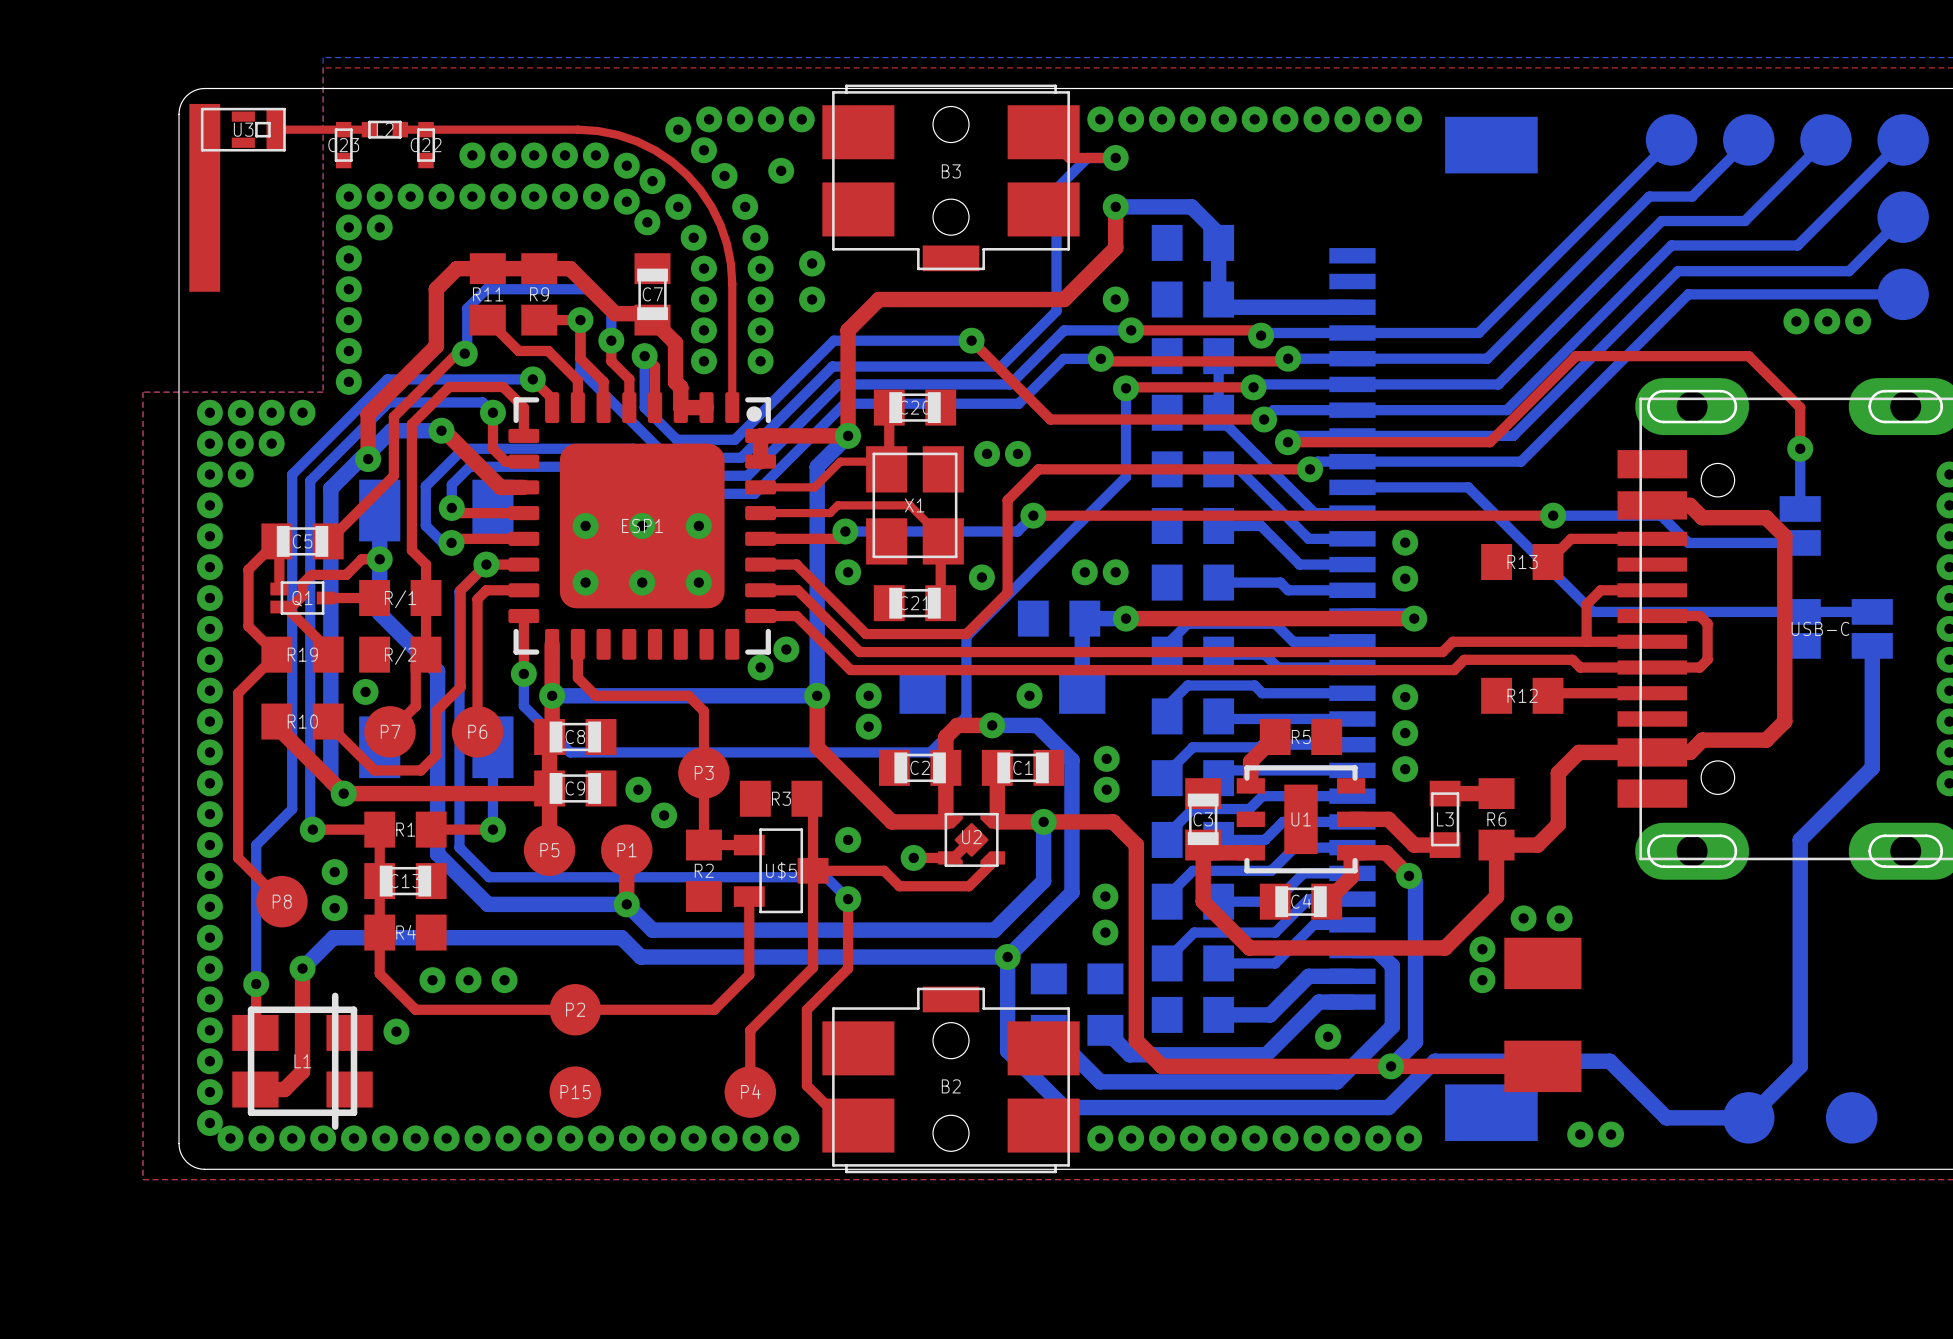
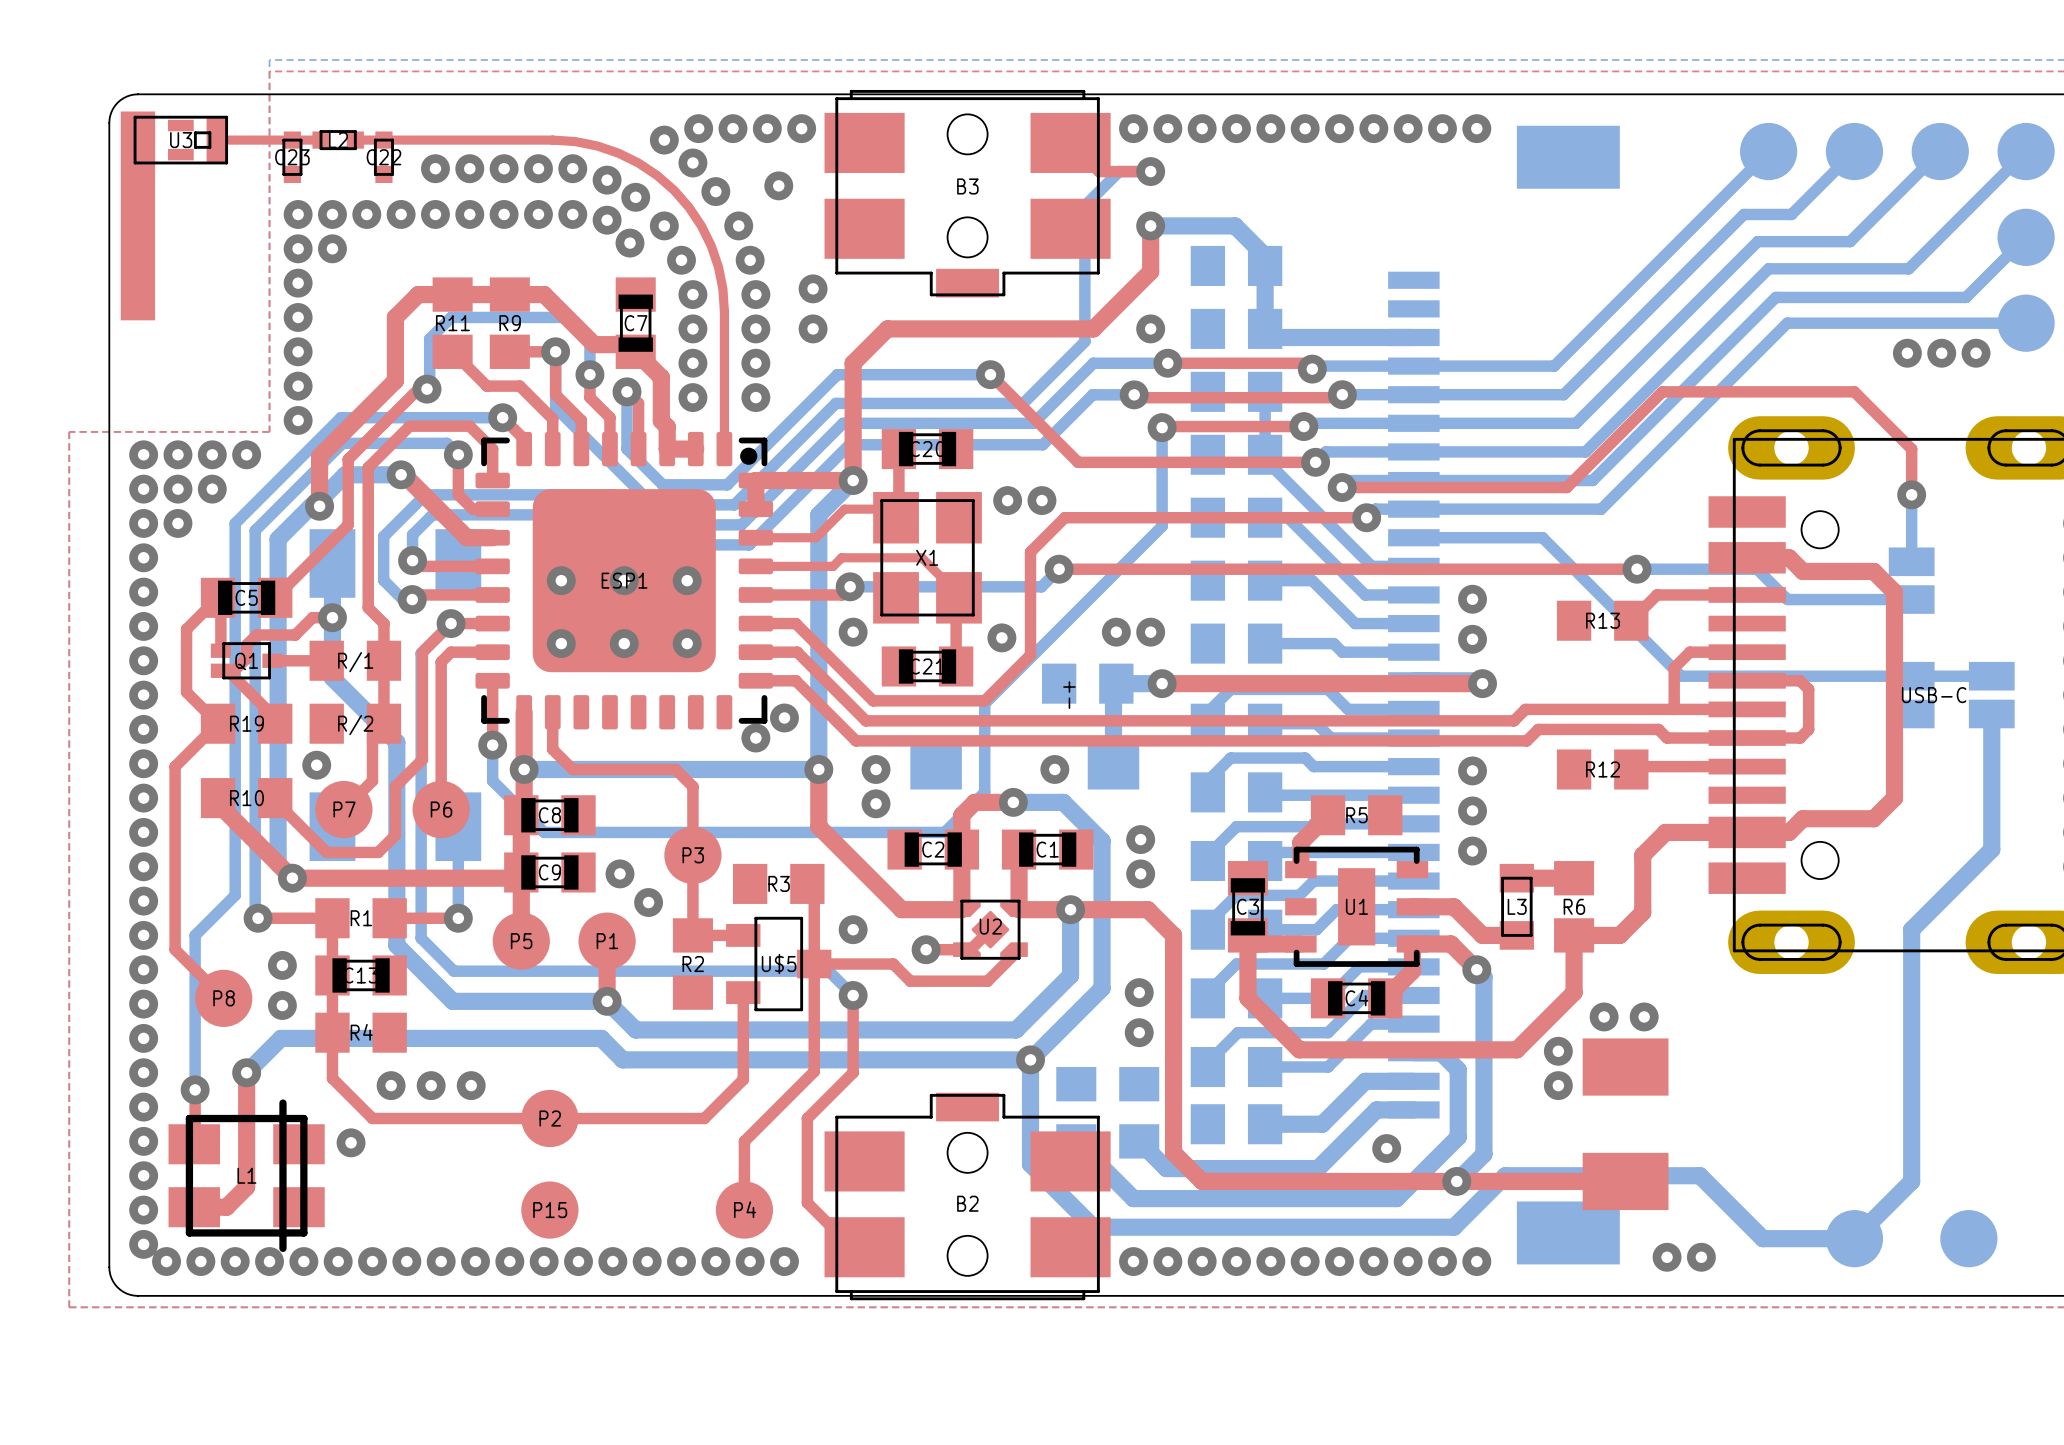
text: none -> -+ (1069, 695)

